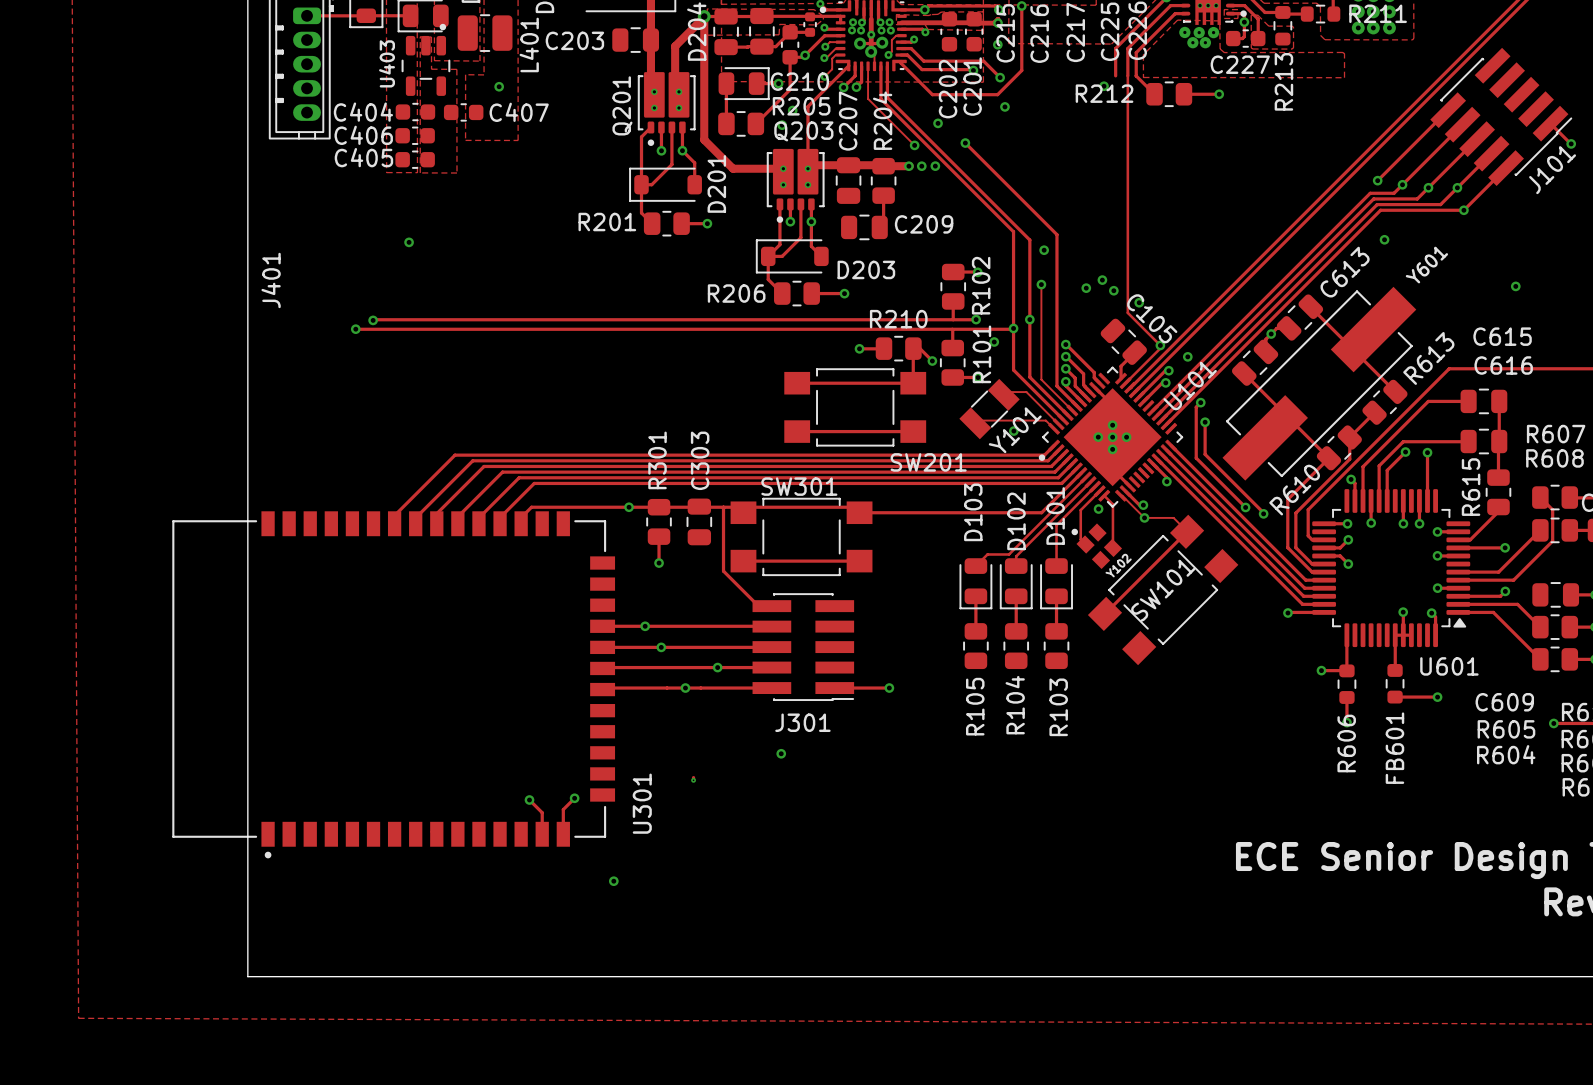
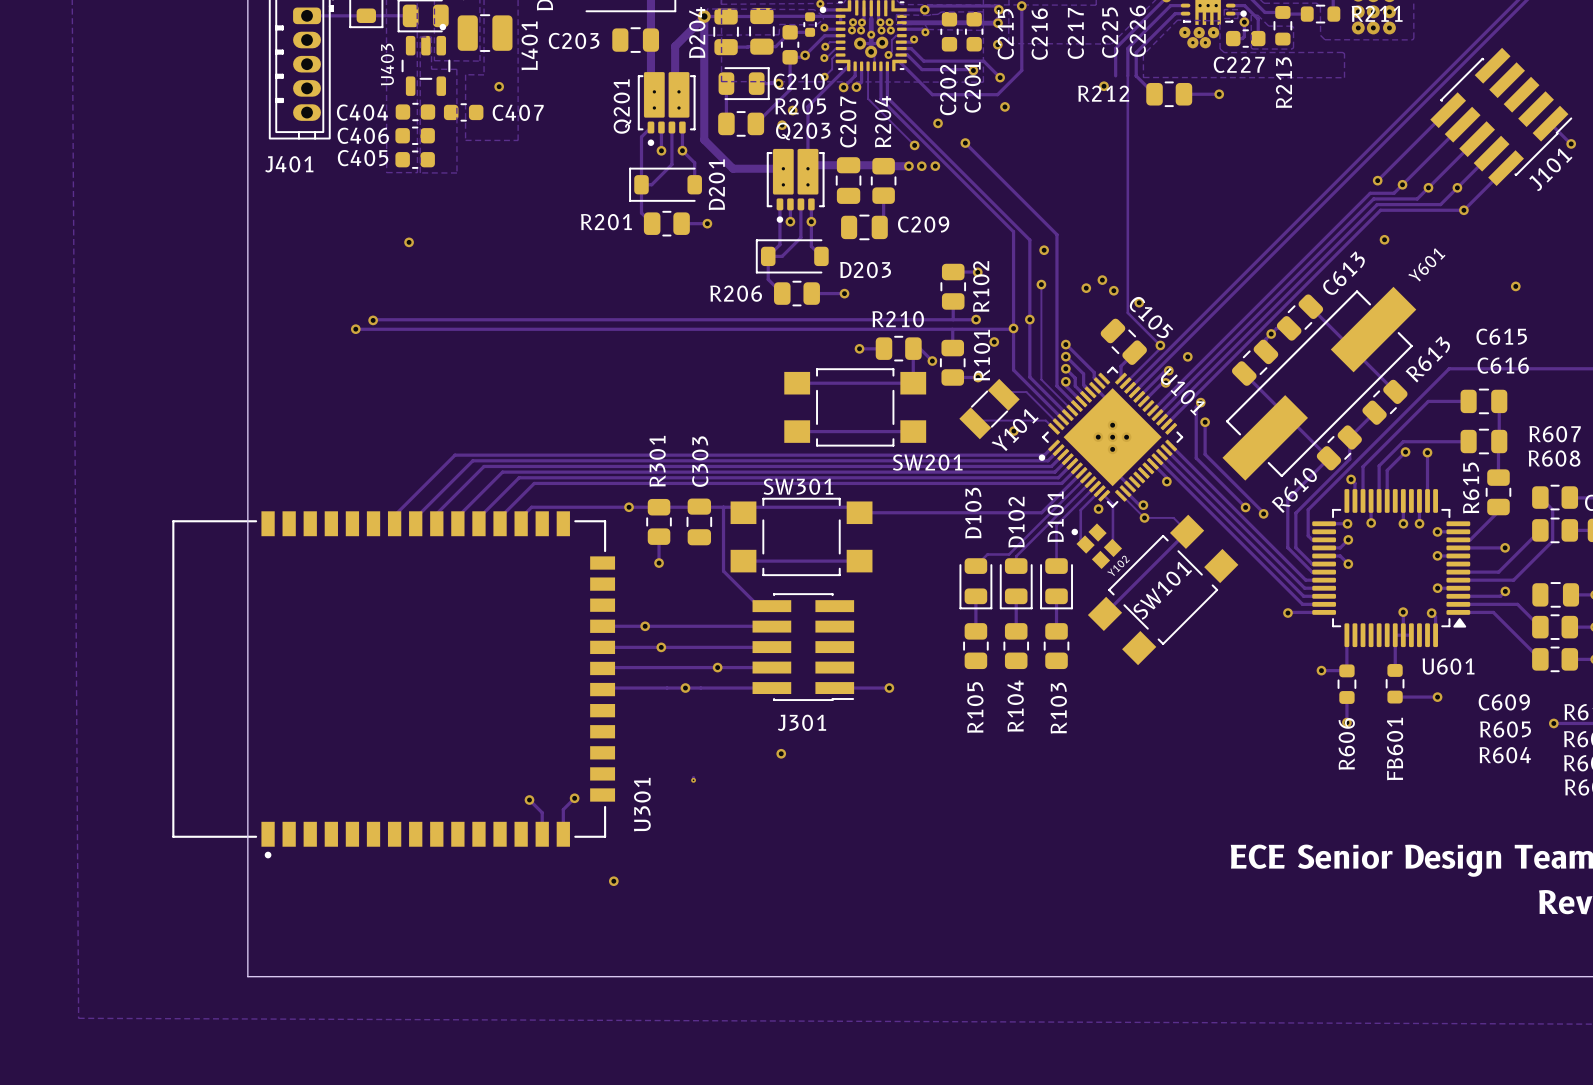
J401 name rotation: 0° (271, 280) -> 90° clockwise (289, 164)
J401 name position: J401 (271, 280) -> J401 (289, 164)
U101 name rotation: 0° (1190, 386) -> 90° clockwise (1182, 391)

